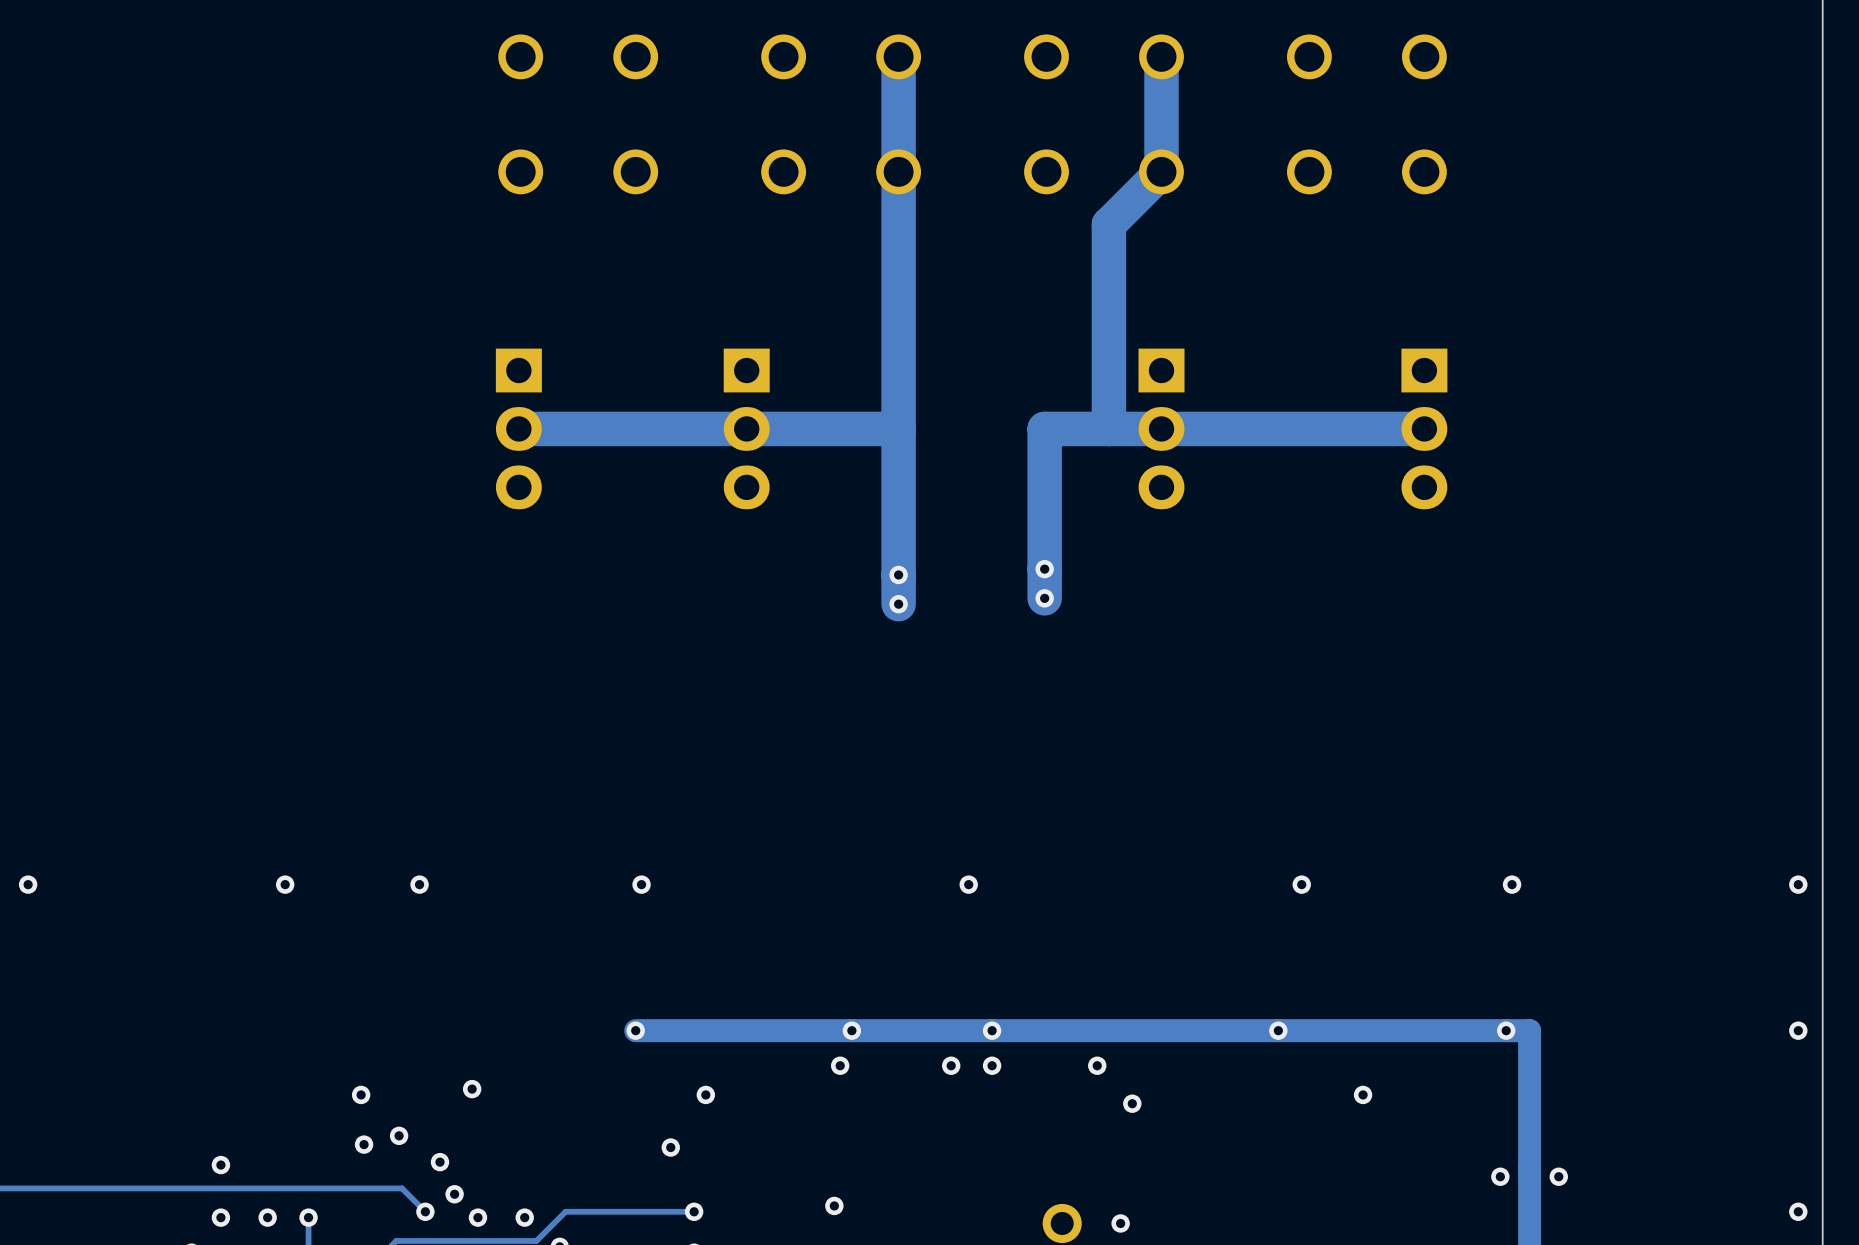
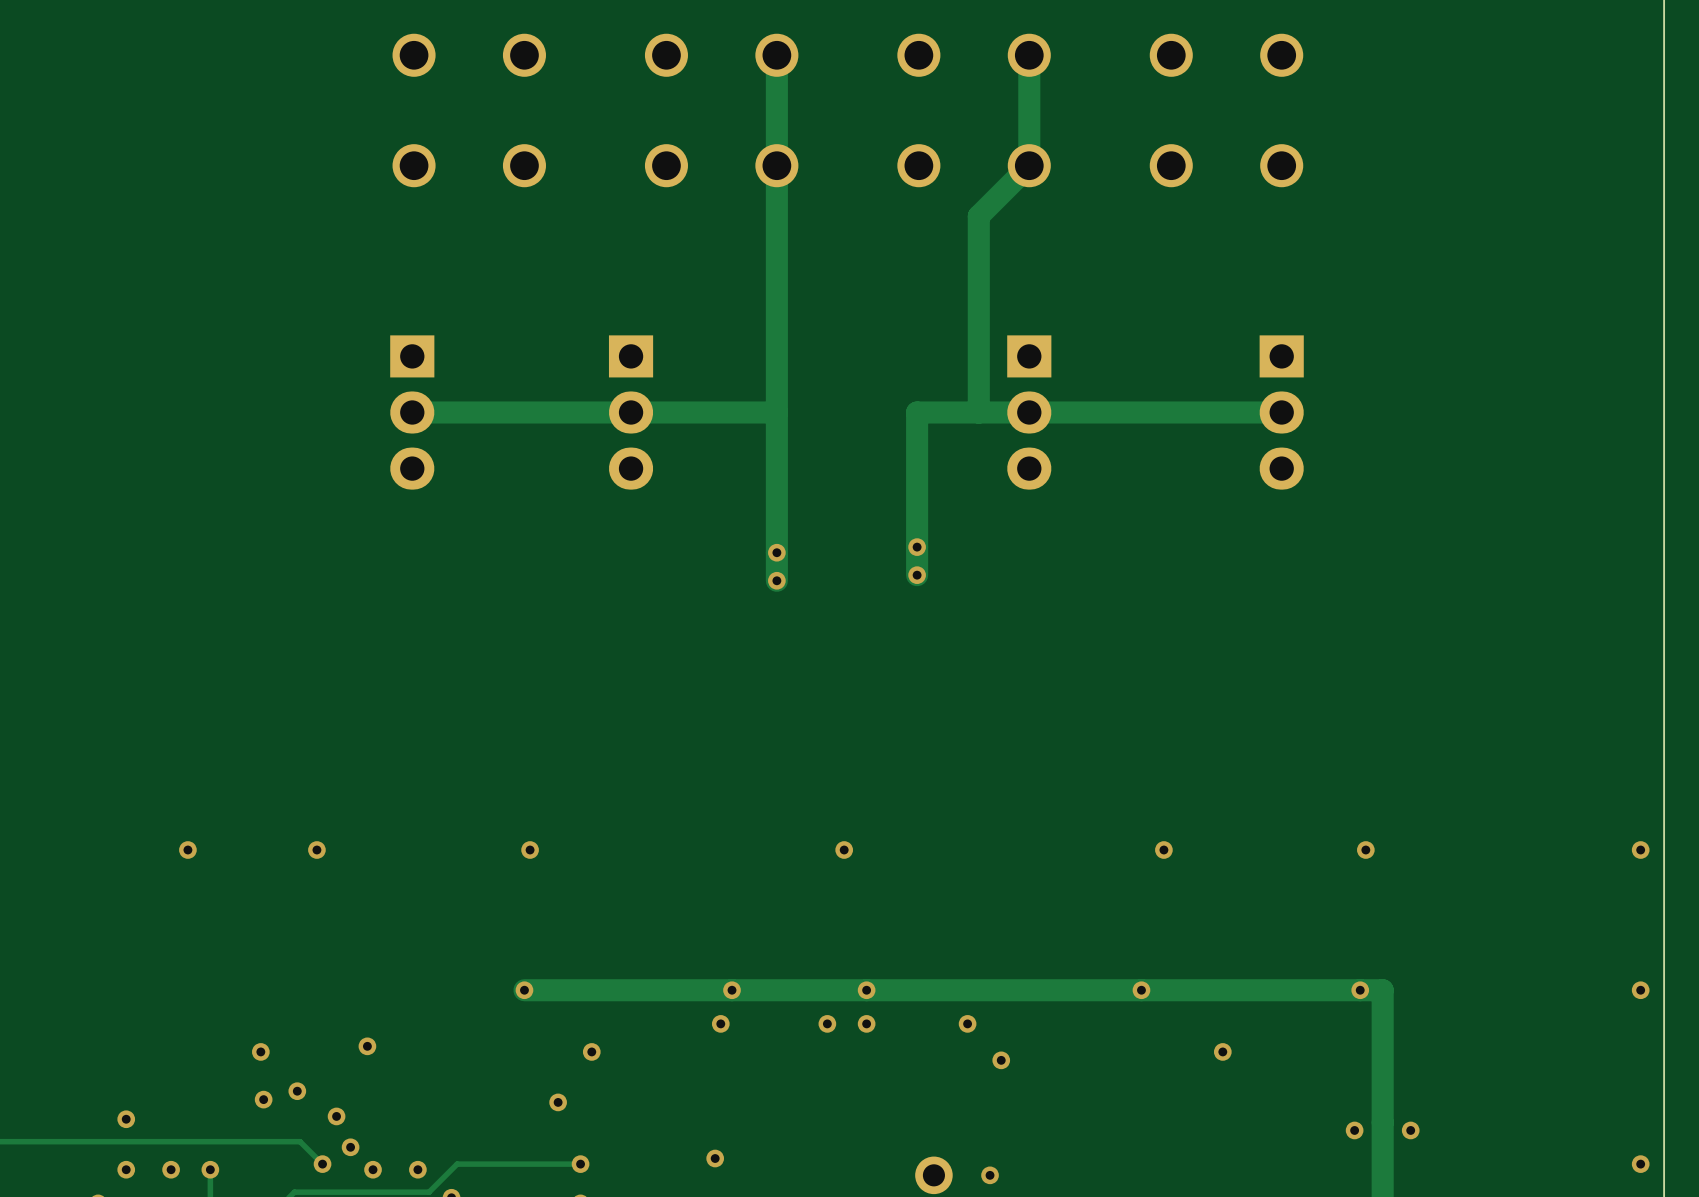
track width: thick (898, 56) (898, 604) -> thin (776, 55) (776, 580)
track width: thick (1161, 56) (1161, 171) (1108, 224) (1108, 428) -> thin (1029, 55) (1029, 165) (978, 216) (978, 412)
track width: thick (898, 428) (518, 428) -> thin (776, 412) (412, 412)
track width: thick (1424, 428) (1044, 428) (1044, 598) -> thin (1281, 412) (917, 412) (917, 575)

